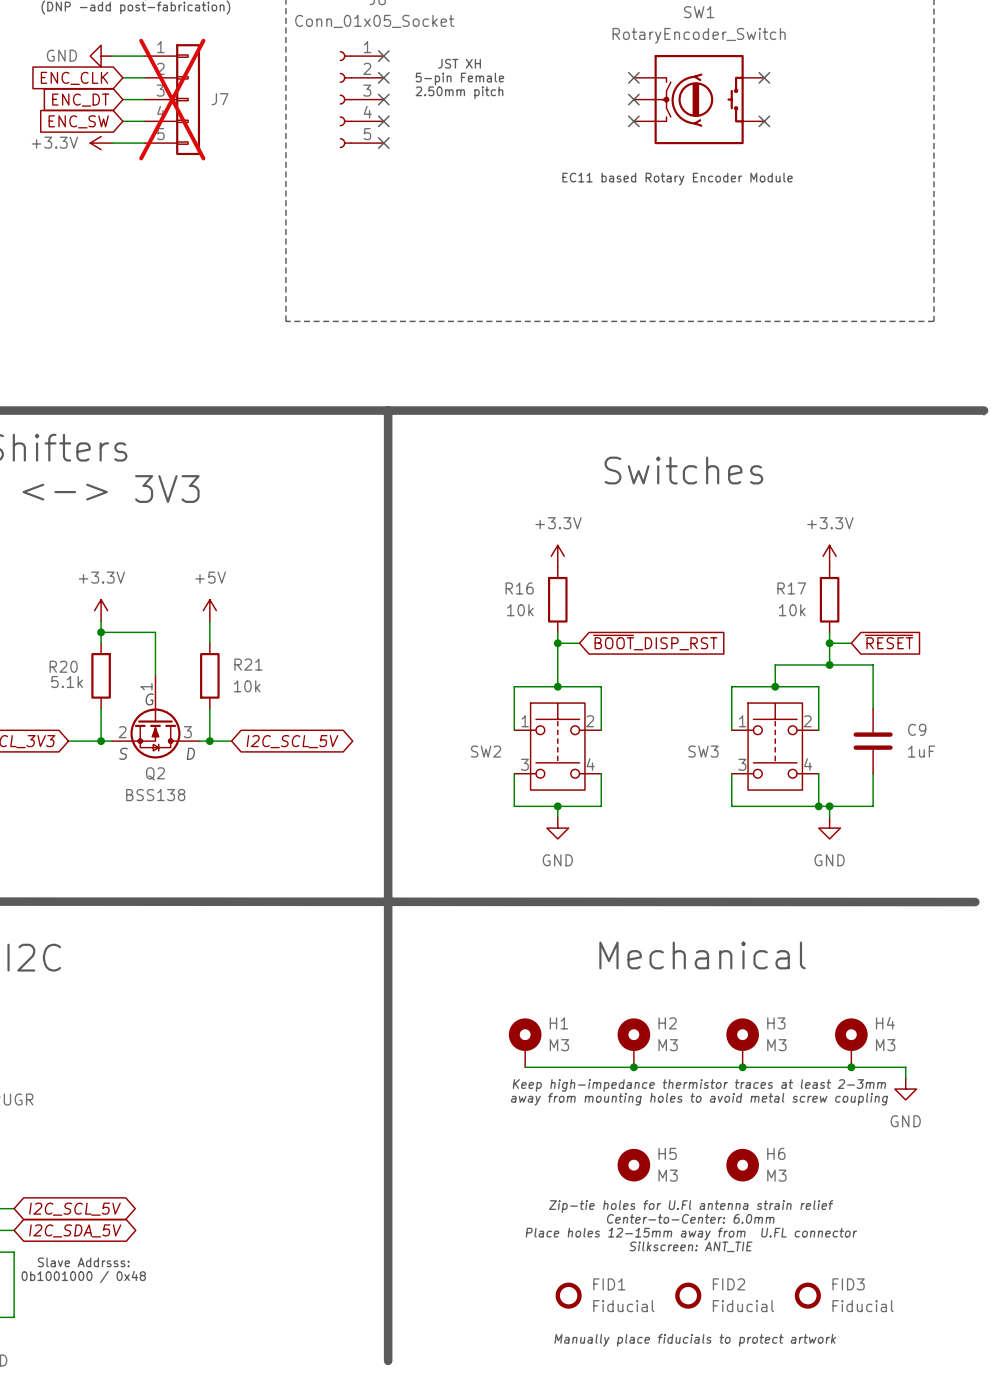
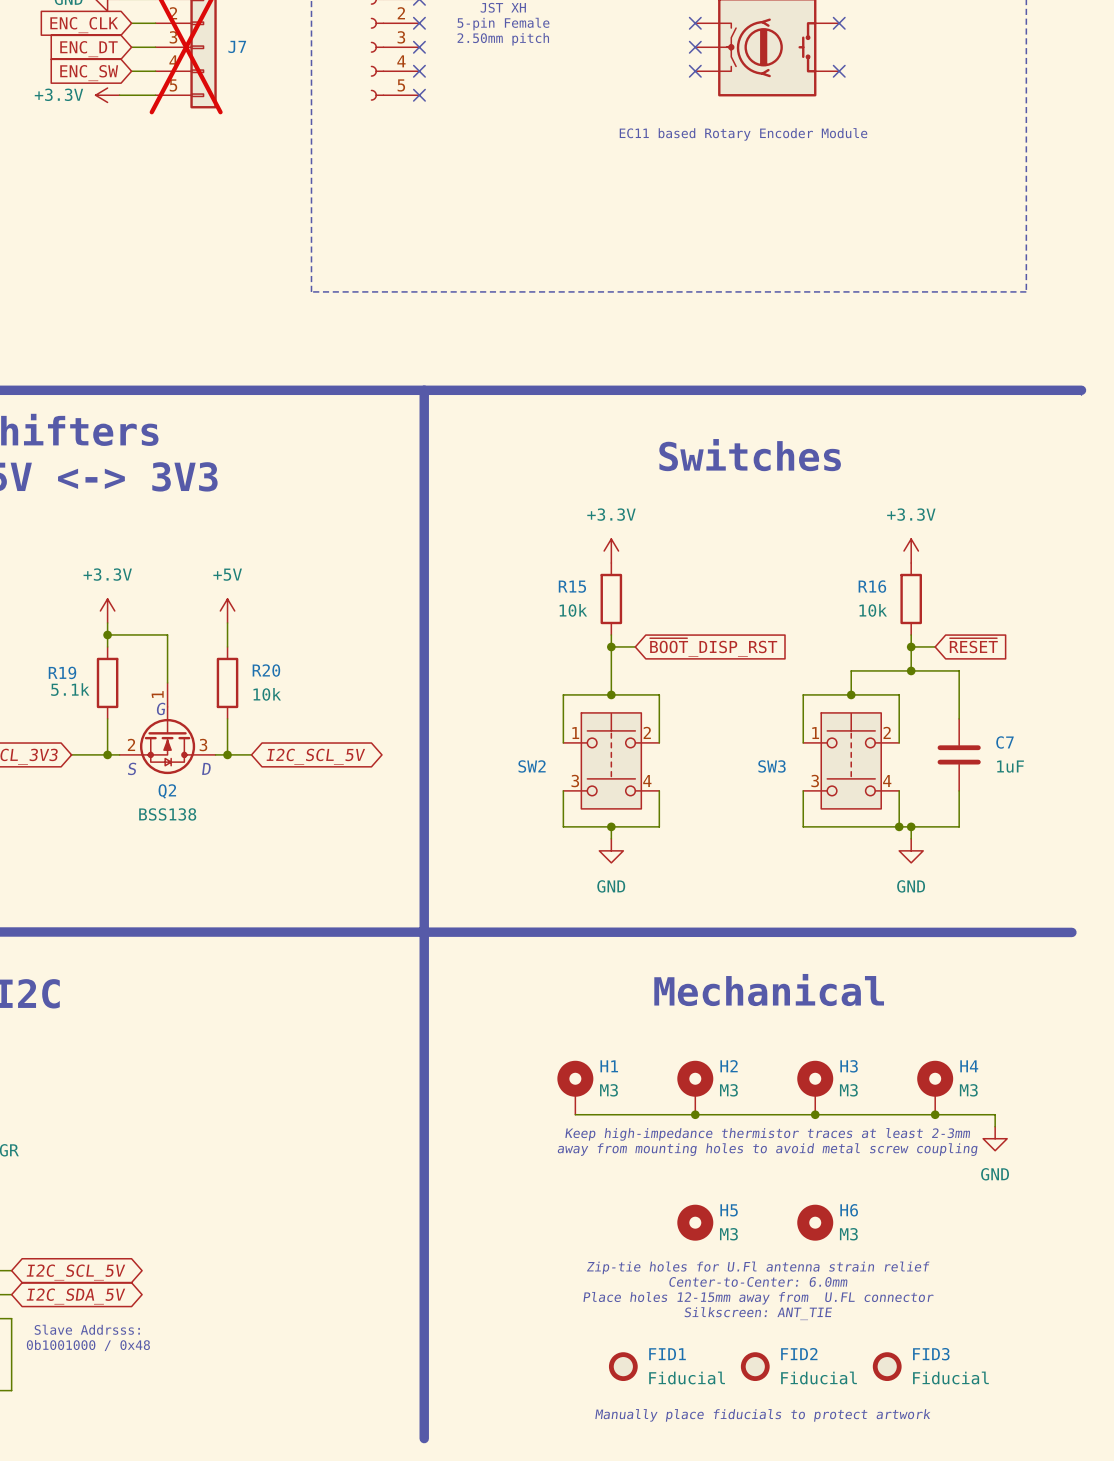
R16 name: R16 (519, 588) -> R15 (572, 586)
R17 name: R17 (791, 588) -> R16 (872, 586)
R21 name: R21 (248, 664) -> R20 (266, 670)
R20 name: R20 (63, 666) -> R19 (62, 672)
C9 name: C9 (917, 729) -> C7 (1005, 742)

